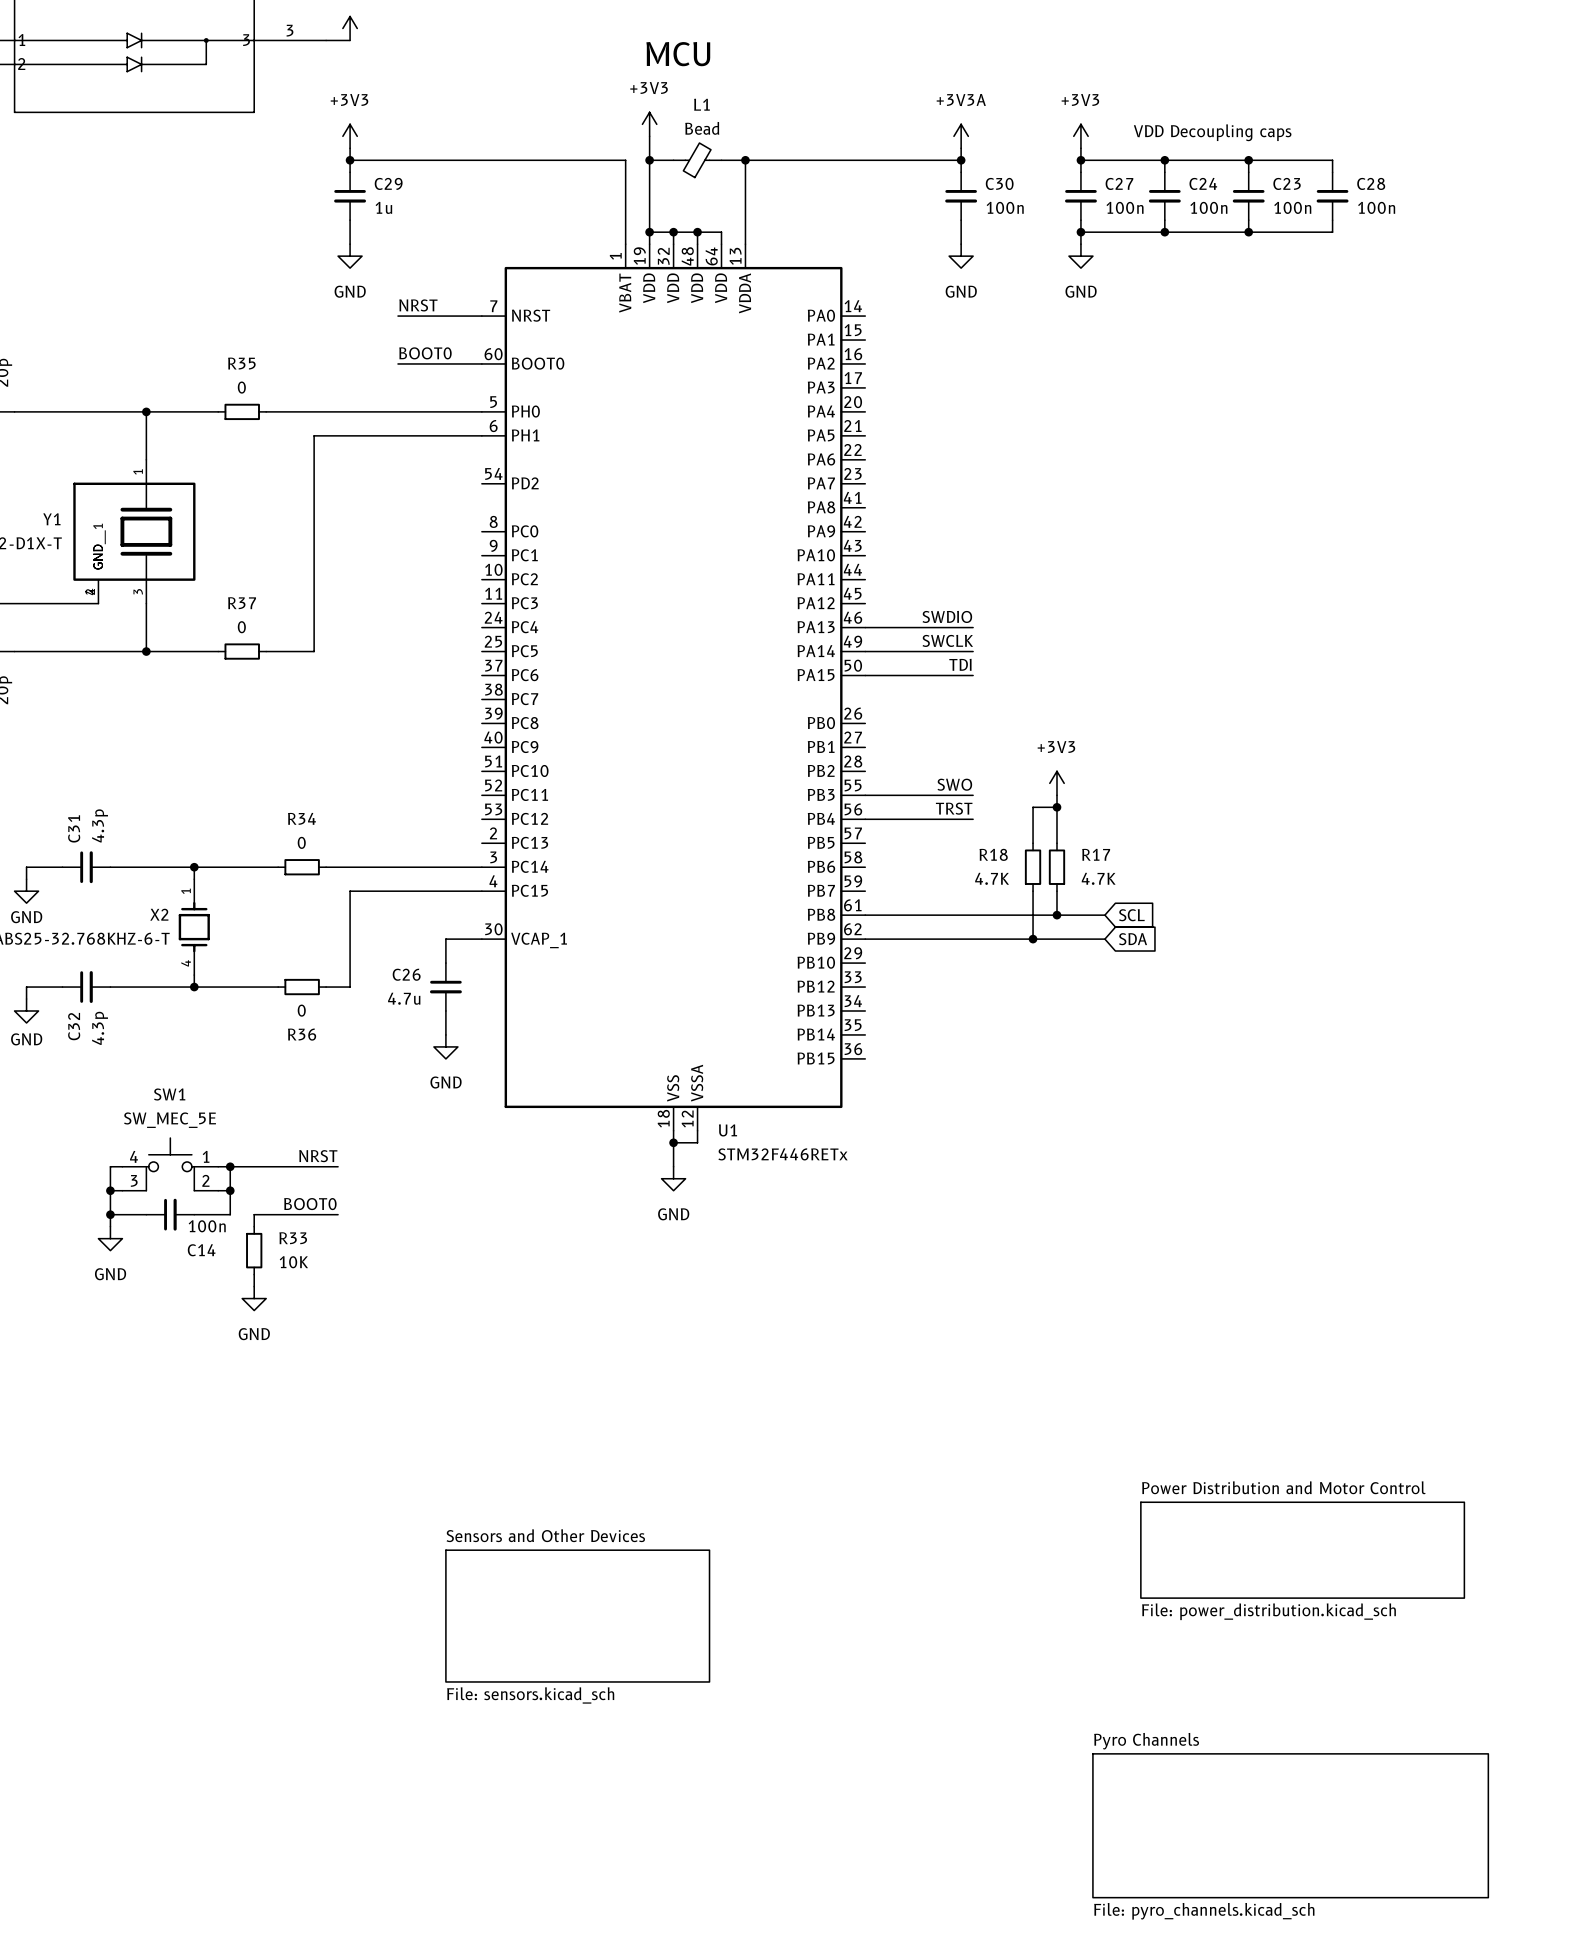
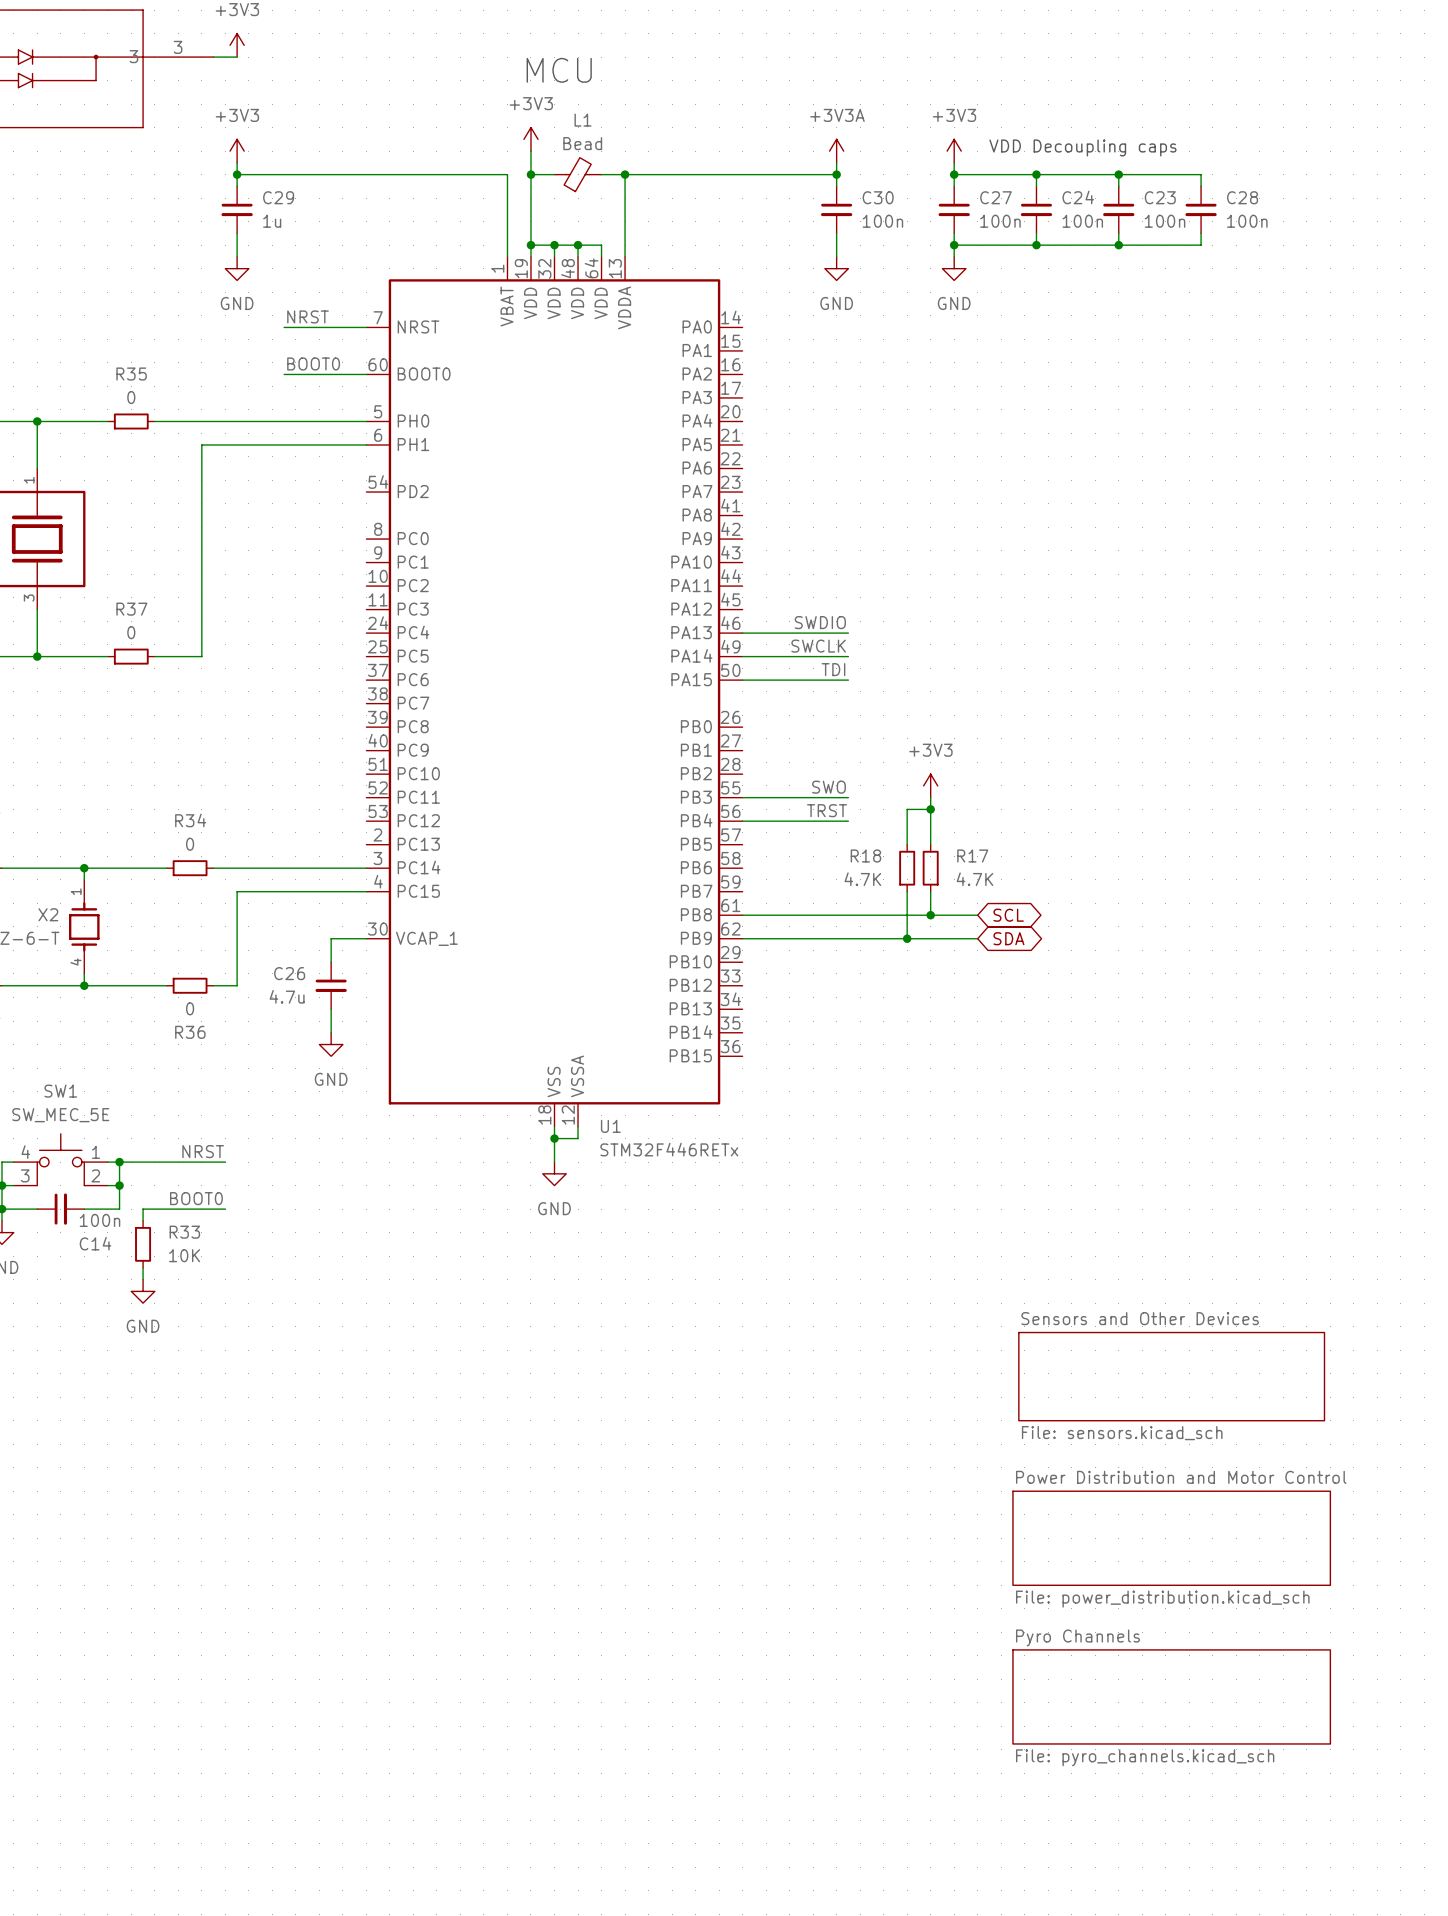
global label shape: input (1131, 915) -> bidirectional (1008, 915)
global label shape: input (1133, 939) -> bidirectional (1008, 938)
sheet Sensors and Other Devices: none -> File: sensors.kicad_sch (1171, 1376)
sheet Sensors and Other Devices: File: sensors.kicad_sch (577, 1616) -> none
sheet Pyro Channels: none -> File: pyro_channels.kicad_sch (1171, 1696)
sheet Pyro Channels: File: pyro_channels.kicad_sch (1290, 1825) -> none

